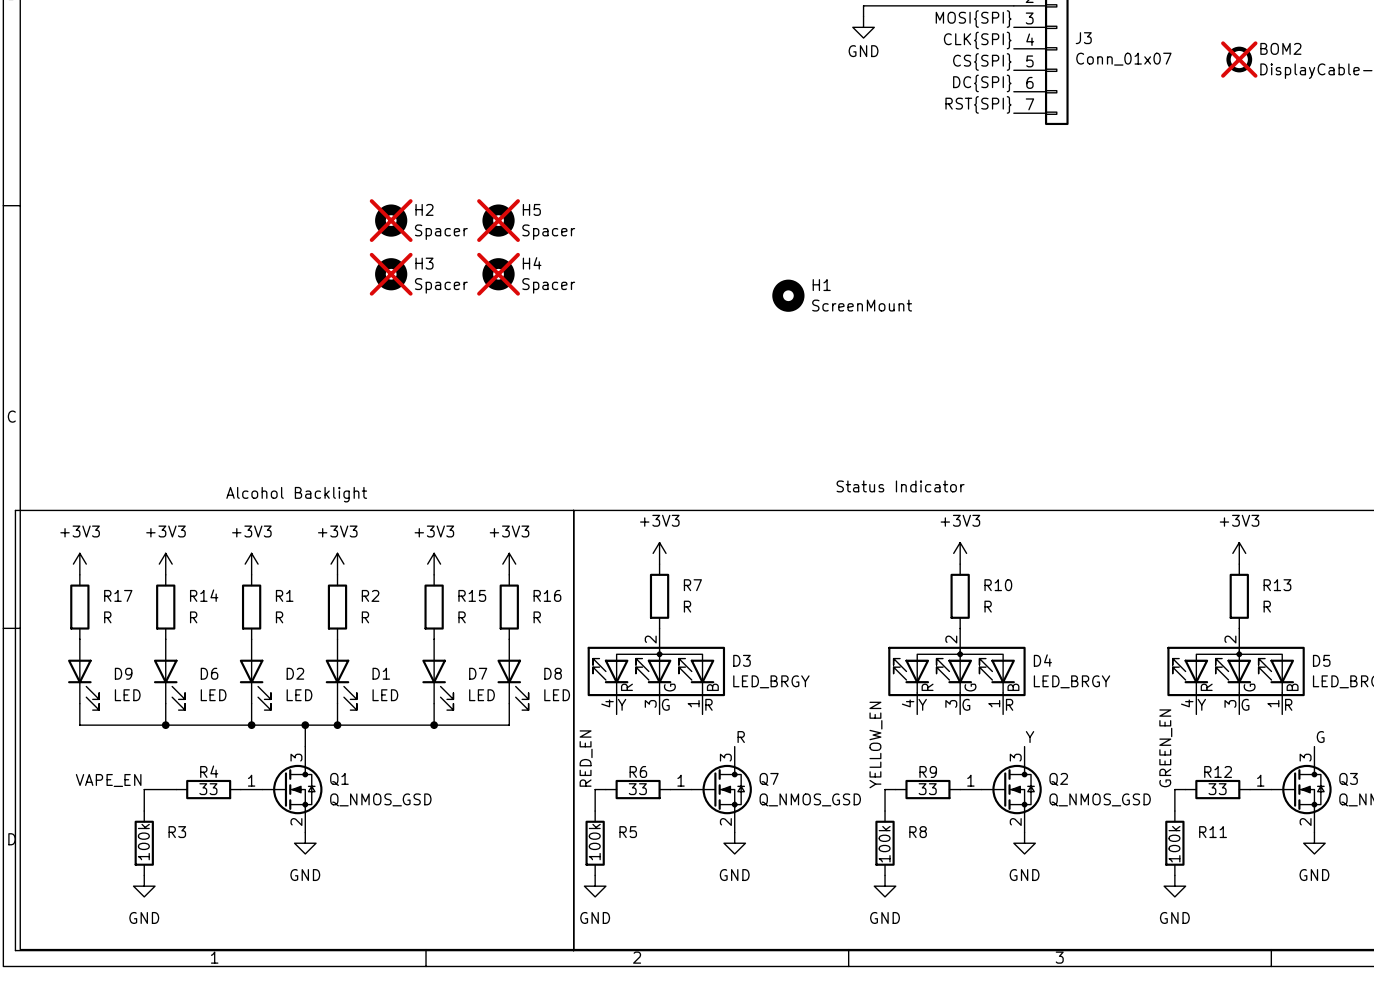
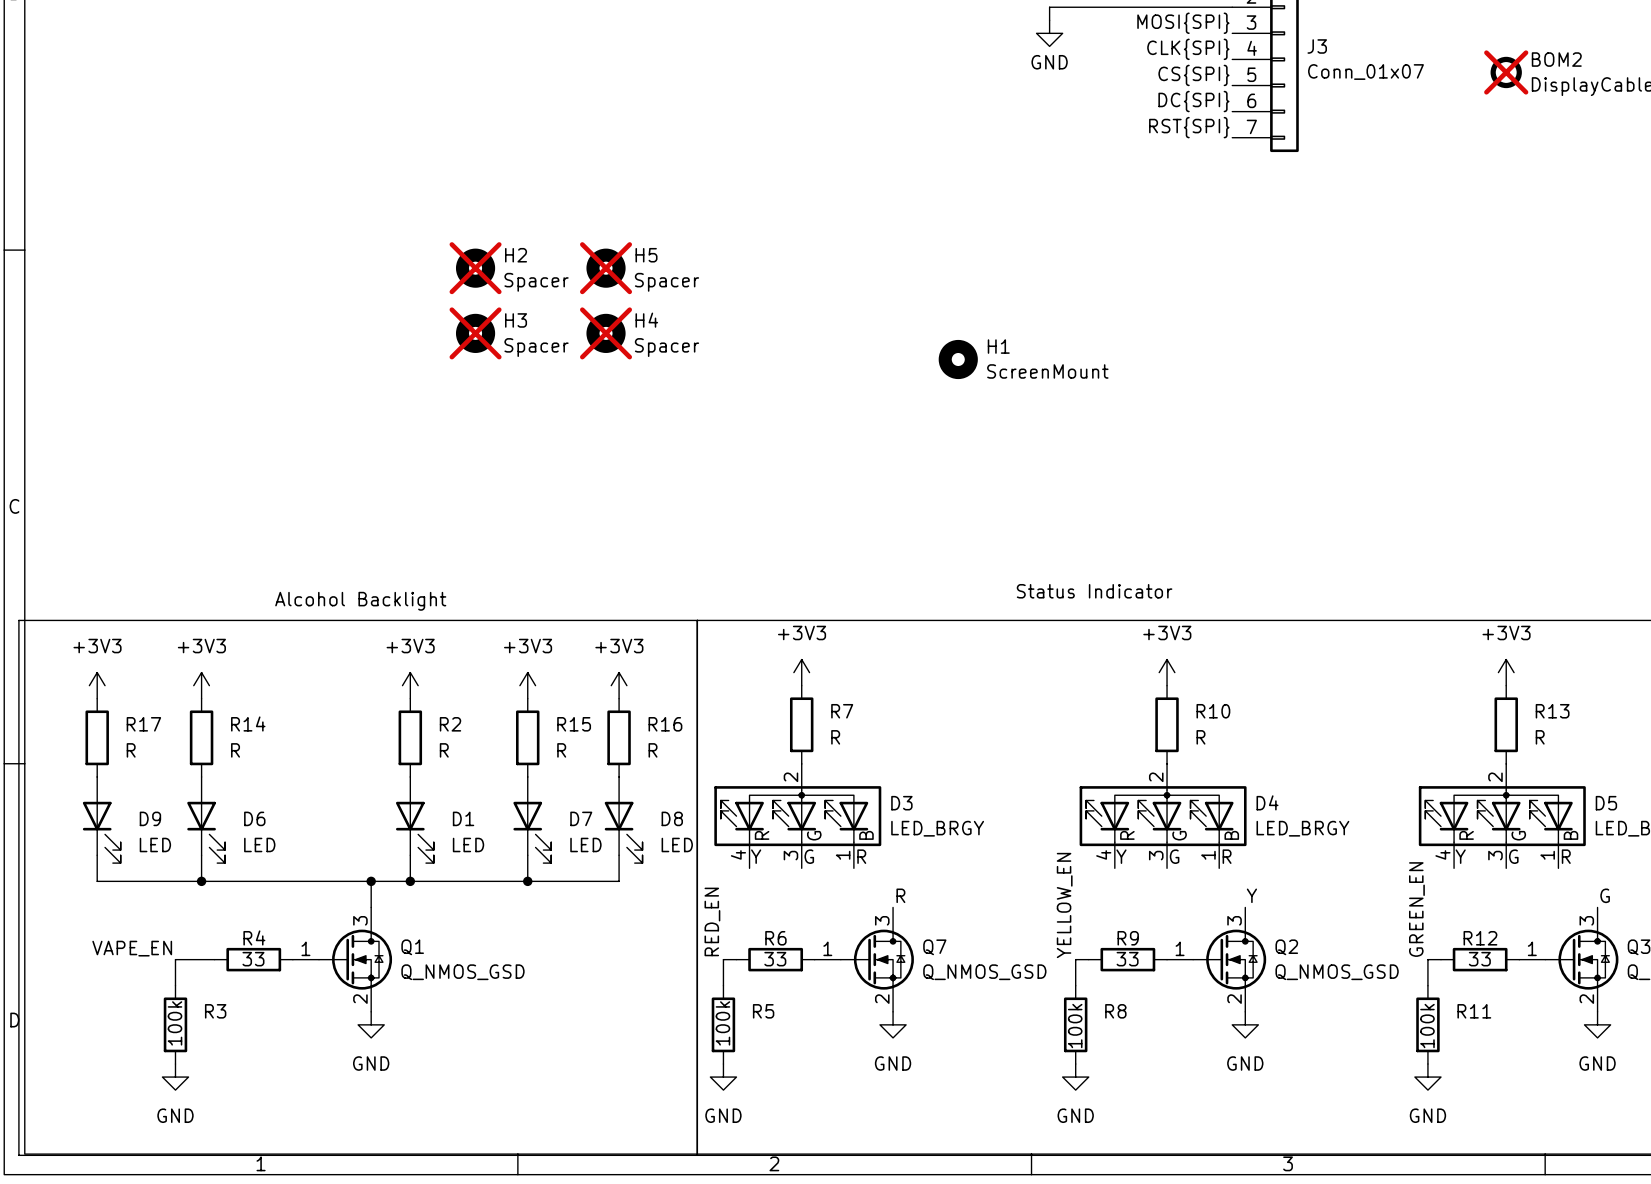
power symbol: +3V3 (251, 564) -> none
R1: R (251, 607) -> none
D2: LED (255, 674) -> none
wire: (251, 703) (251, 725) -> none
junction: (251, 725) -> none

